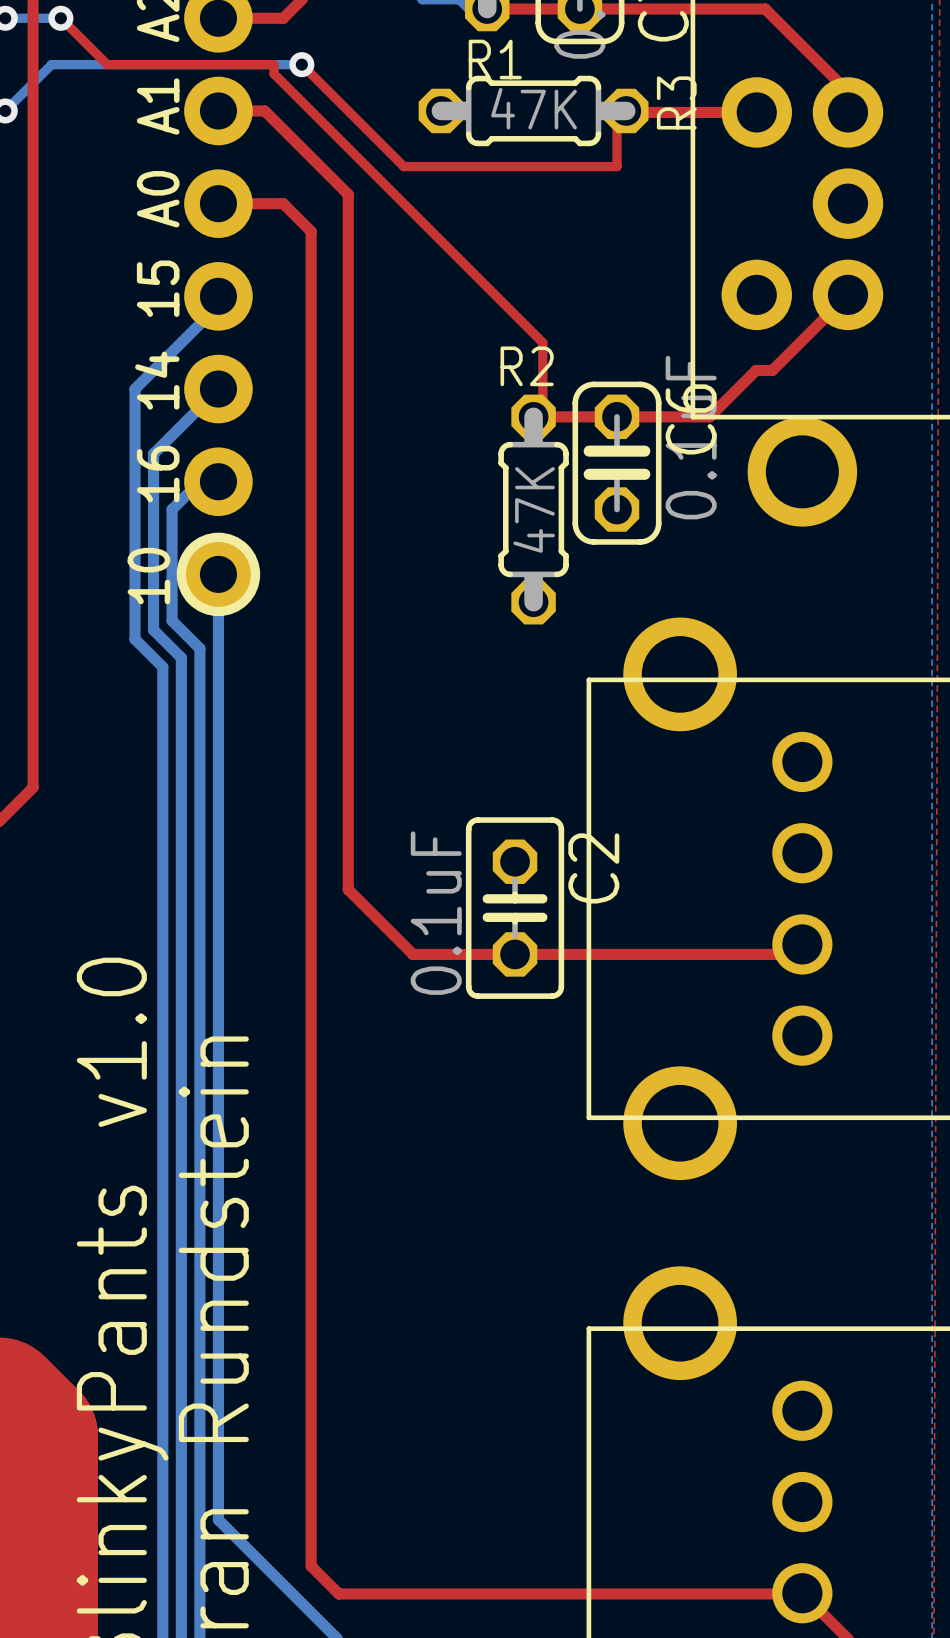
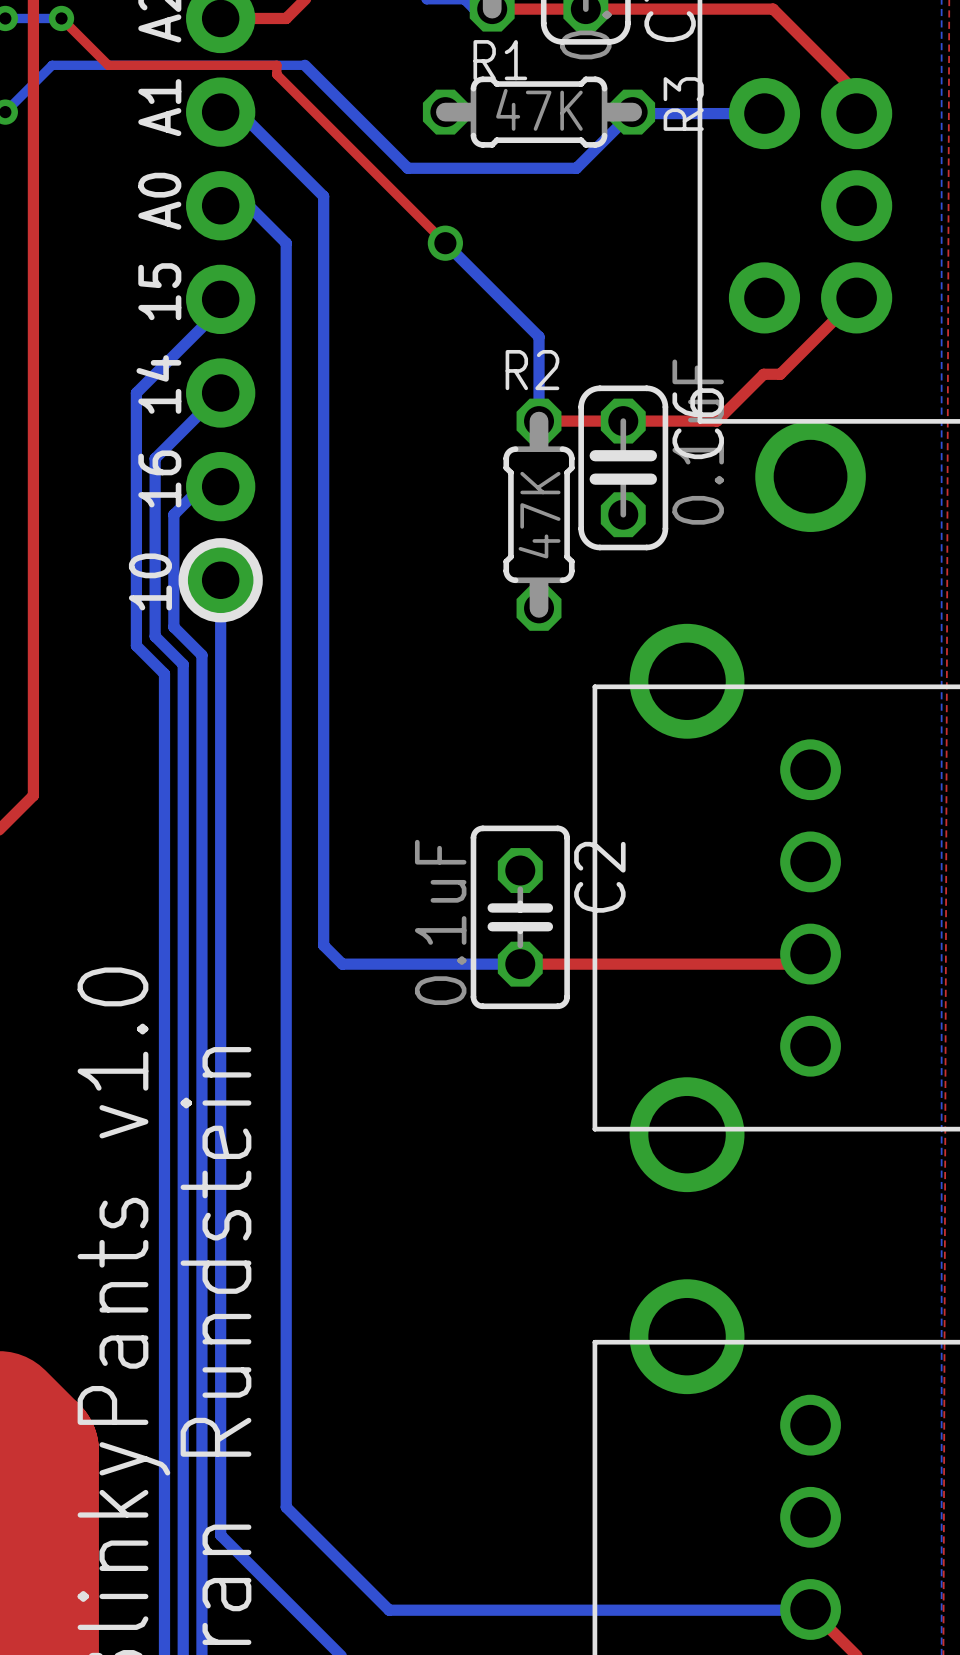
bottom track: none -> (304, 65) (407, 168) (576, 168) (632, 112) (764, 113)
top track: (301, 64) (403, 166) (617, 166) (617, 120) -> none
via: (301, 64) -> none
bottom track: none -> (220, 112) (239, 112) (323, 196) (323, 945) (342, 964) (520, 964)
top track: (218, 110) (264, 110) (348, 194) (348, 889) (413, 954) (515, 954) -> none
top track: (627, 112) (756, 112) -> none
bottom track: none -> (220, 205) (248, 205) (286, 243) (286, 1507) (389, 1610) (810, 1609)
top track: (218, 203) (283, 203) (311, 231) (311, 1566) (338, 1593) (802, 1593) -> none
bottom track: none -> (445, 243) (539, 336) (539, 421)
top track: (440, 240) (542, 342) (542, 416) -> none
via: none -> (445, 243)

